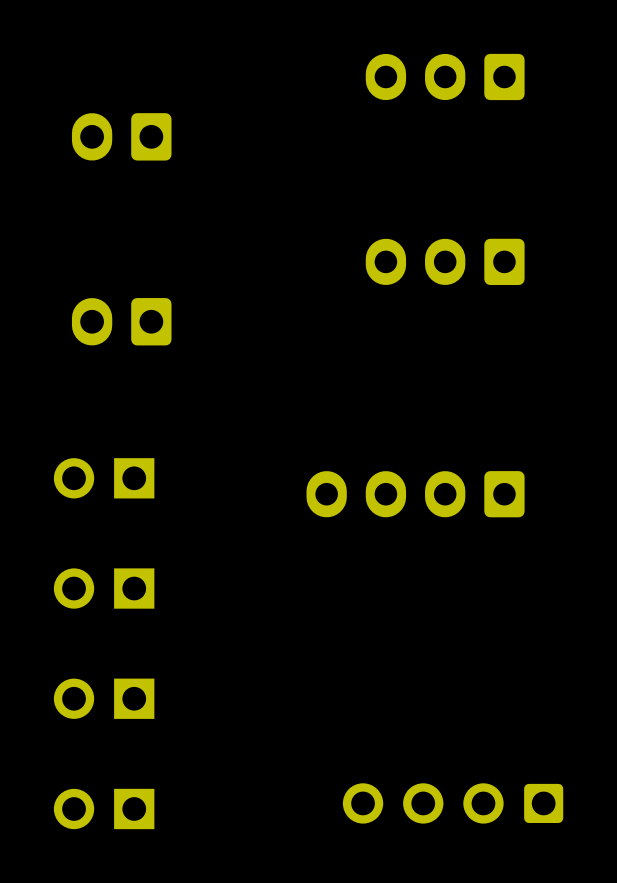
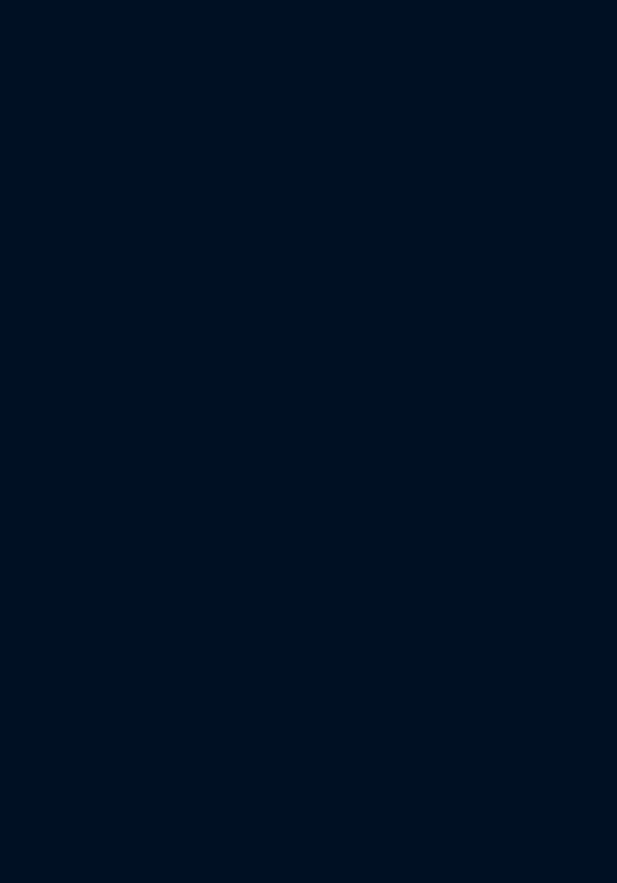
part: (445, 76) -> none
part: (121, 136) -> none
part: (445, 261) -> none
part: (121, 321) -> none
part: (104, 478) -> none
part: (415, 494) -> none
part: (104, 588) -> none
part: (104, 698) -> none
part: (453, 803) -> none
part: (104, 808) -> none

